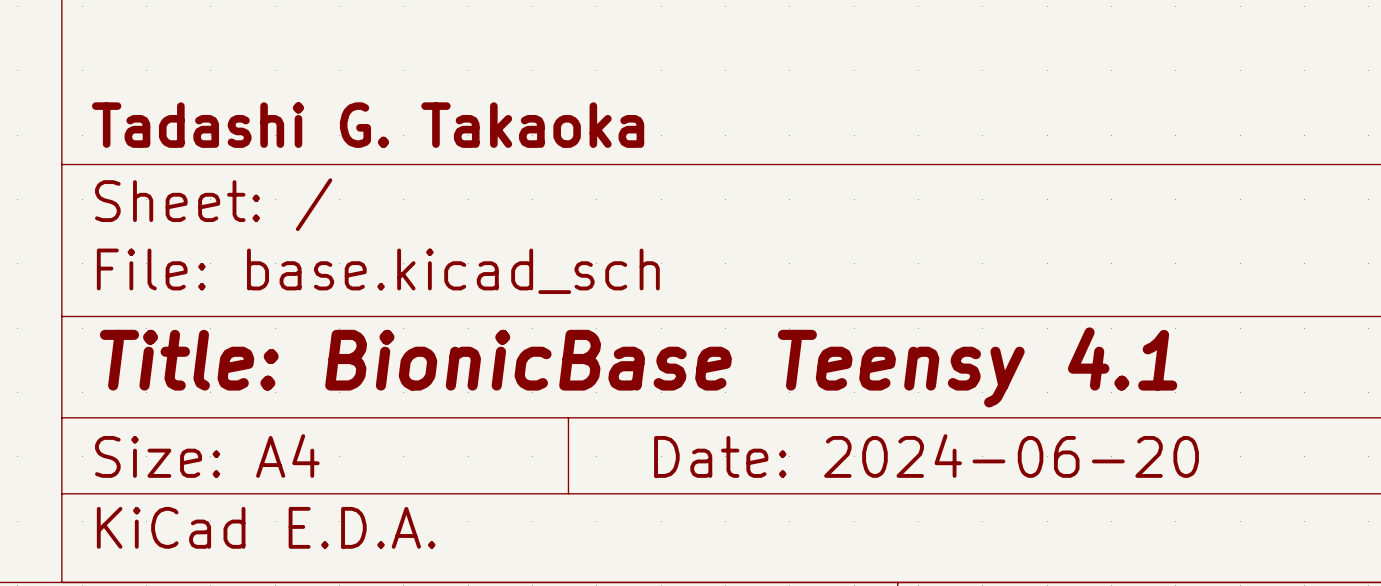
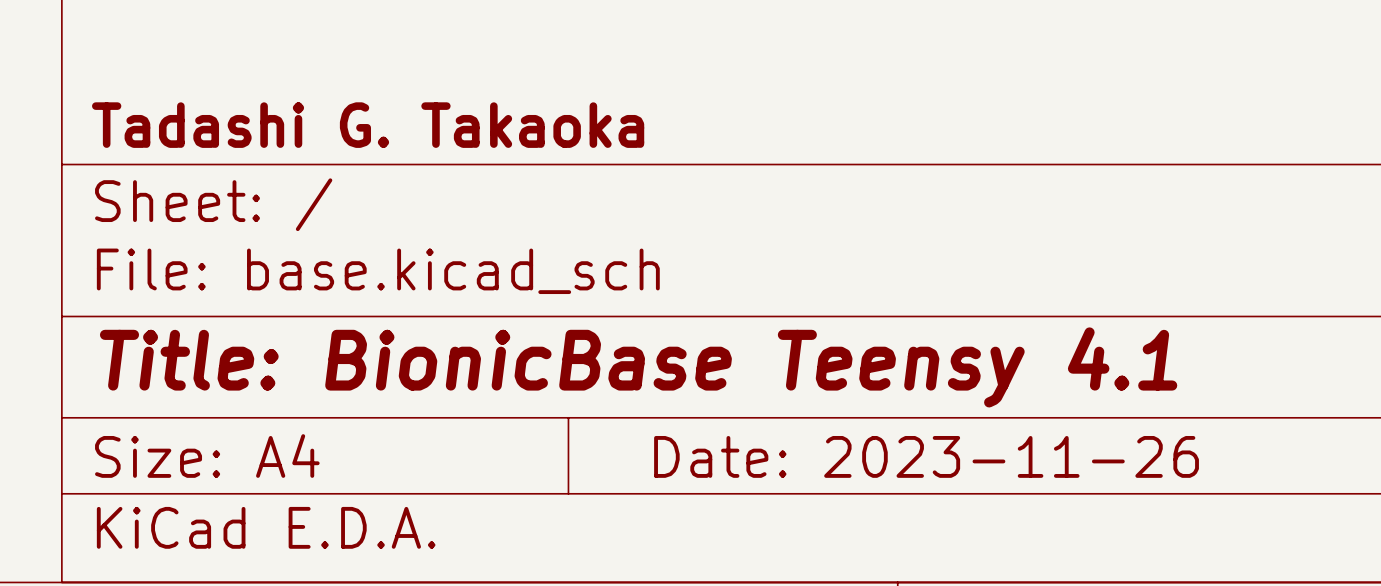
title block: Date: 2024-06-20 (926, 456) -> Date: 2023-11-26 (926, 456)

